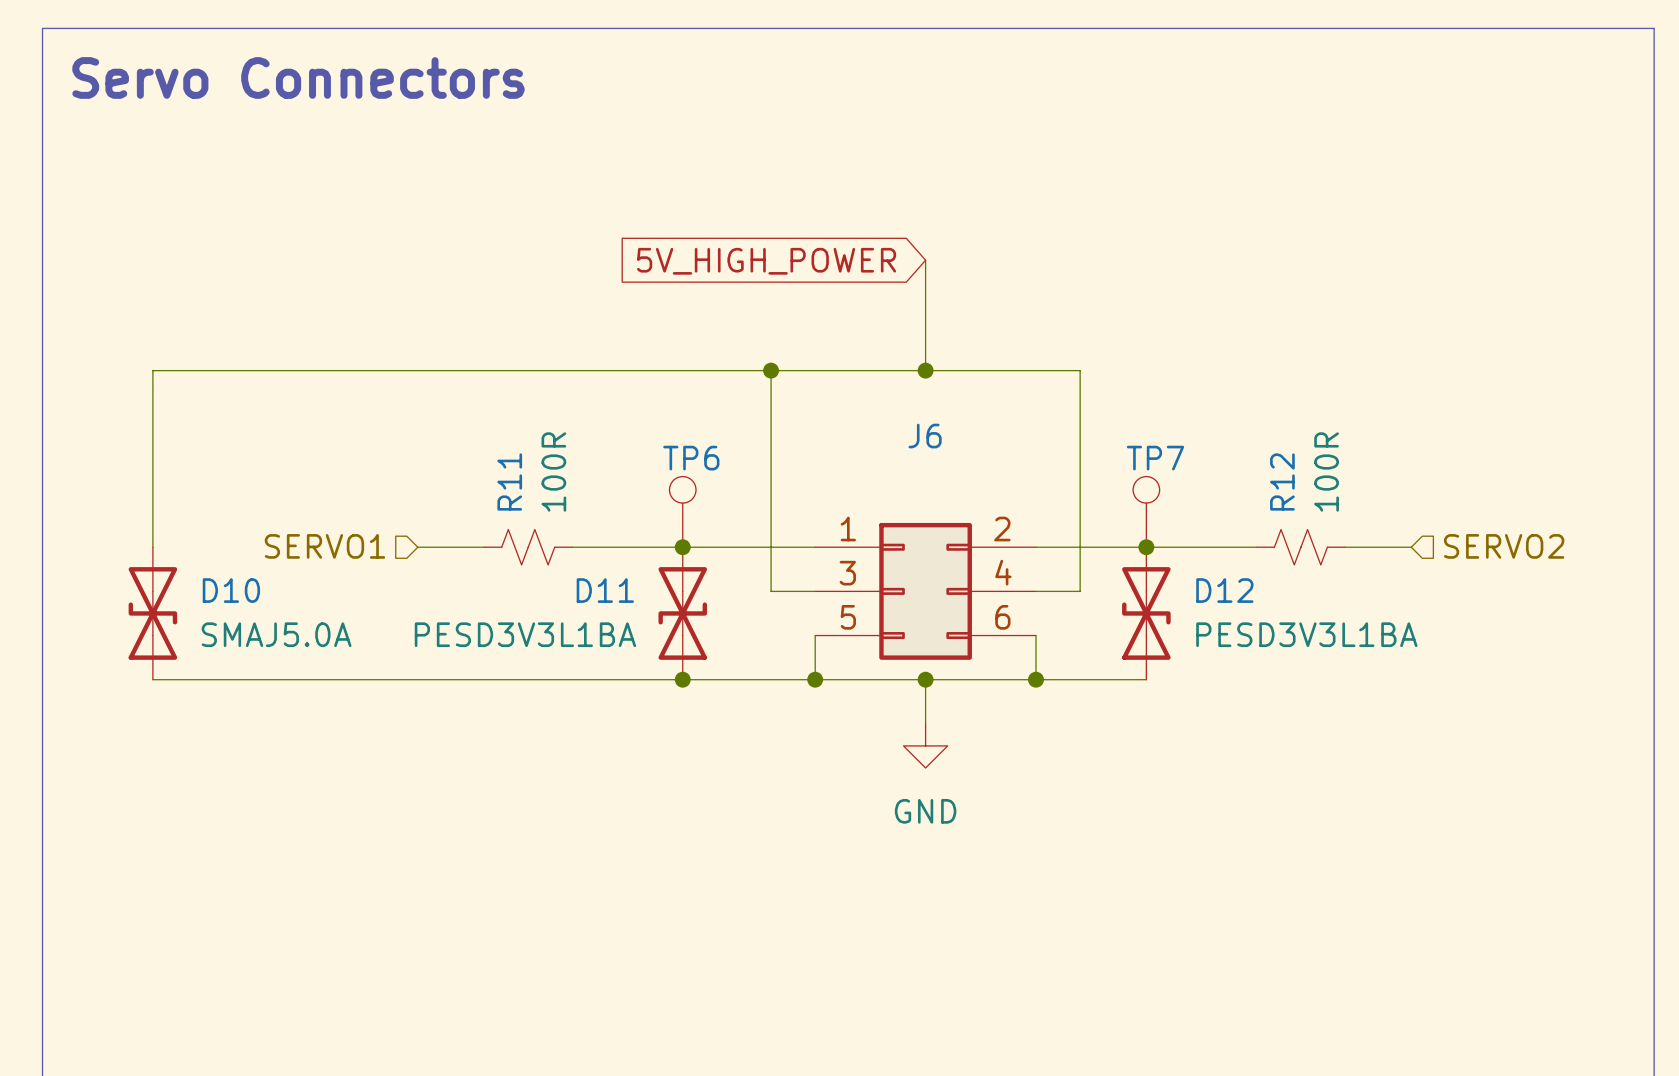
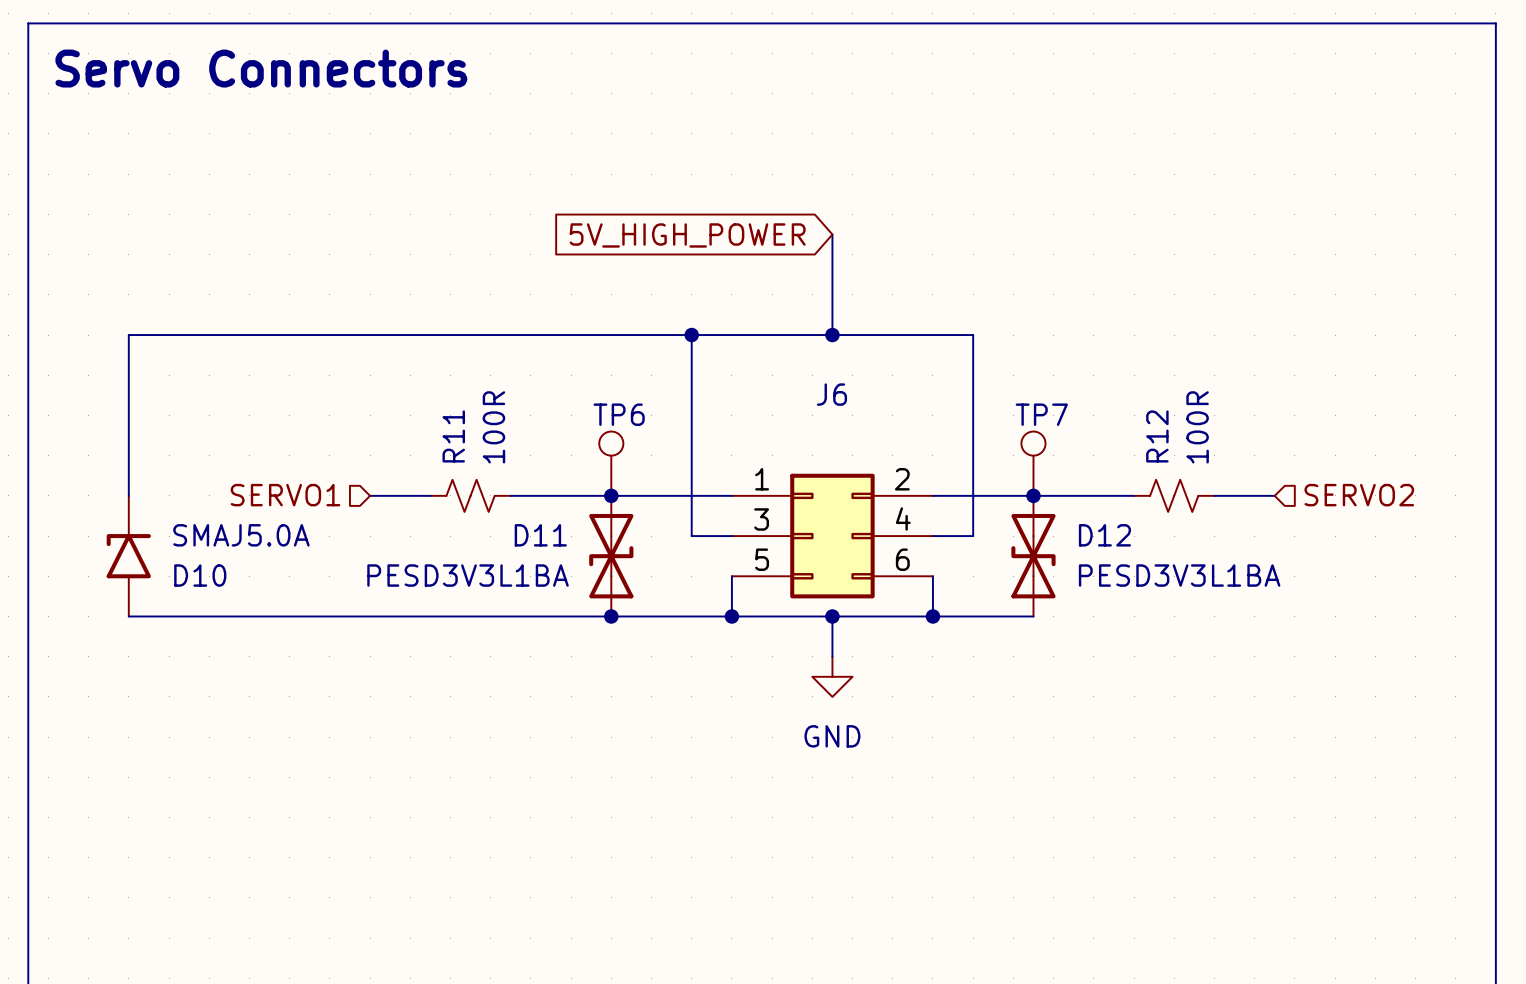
D10 symbol: [128, 547, 178, 680] -> [106, 495, 151, 617]
D10 name position: D10 (231, 590) -> D10 (200, 575)
D10 value position: SMAJ5.0A (276, 634) -> SMAJ5.0A (241, 535)

